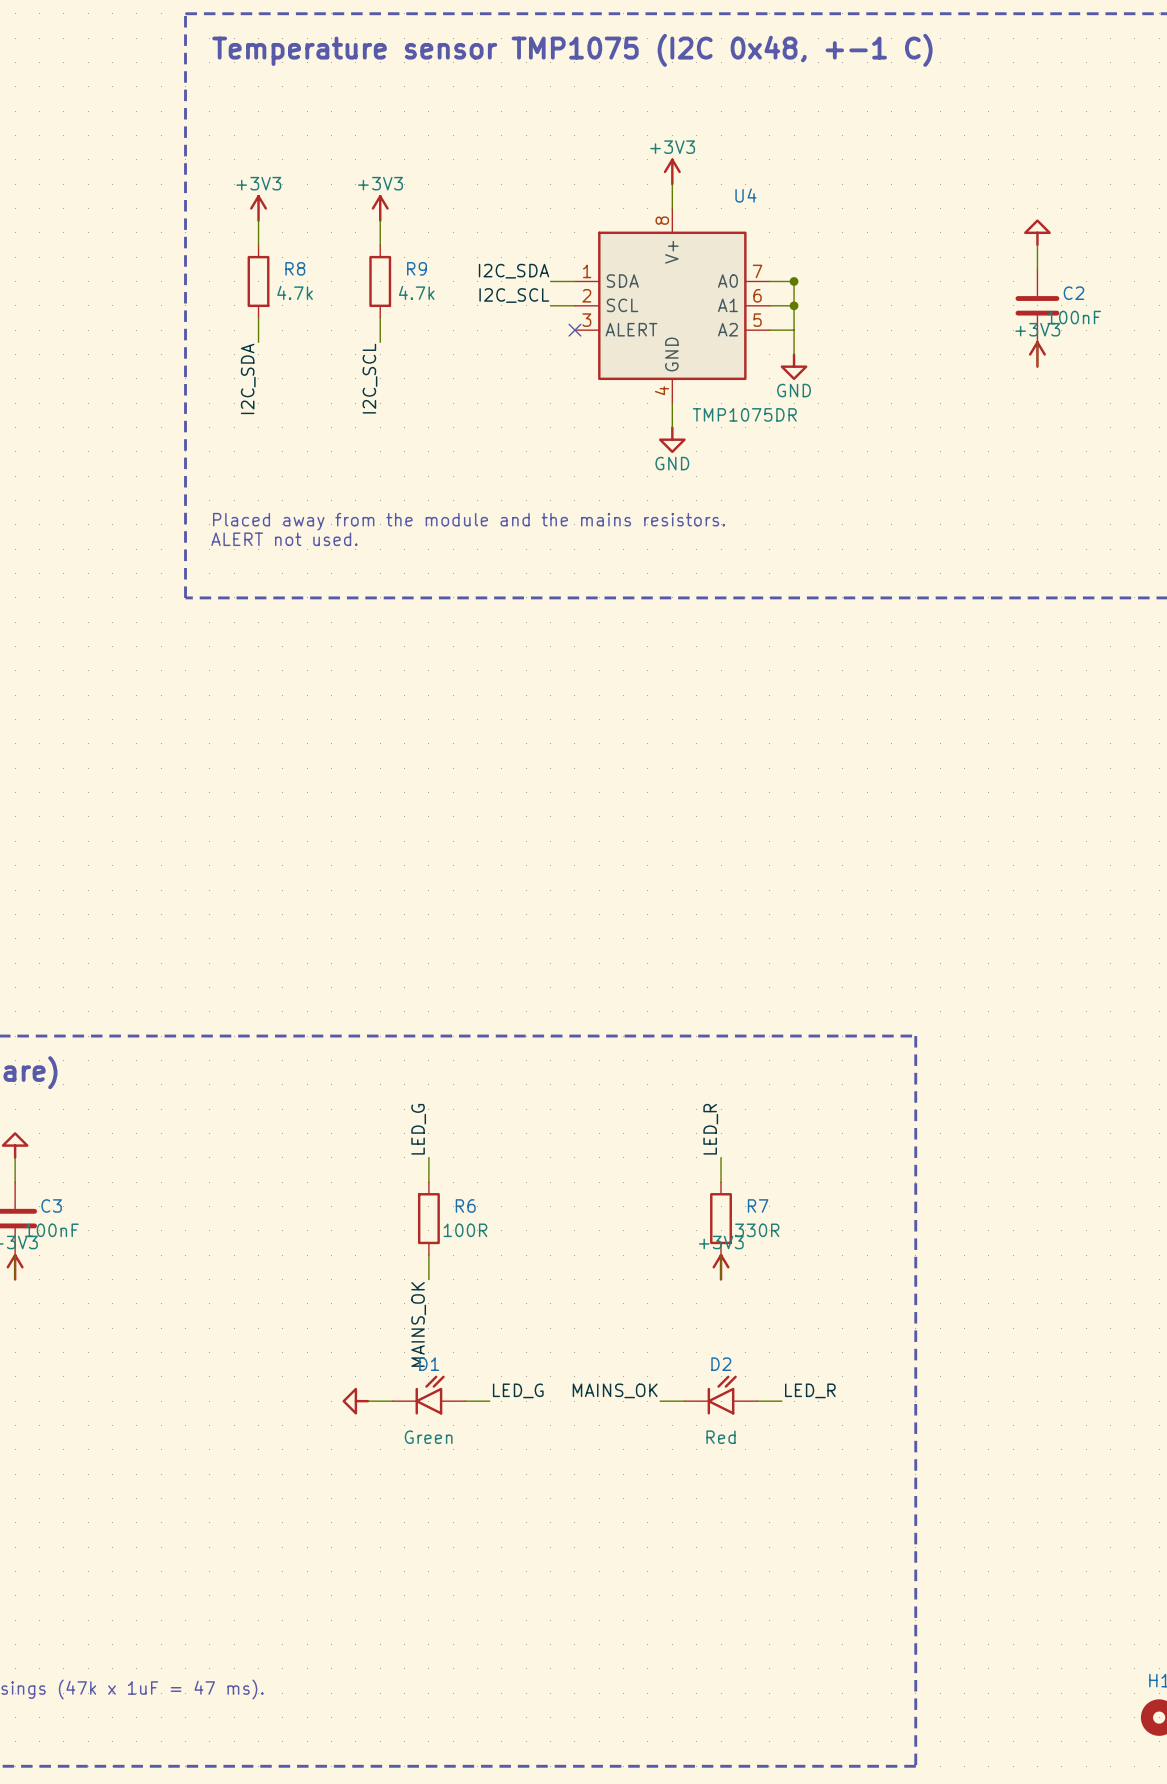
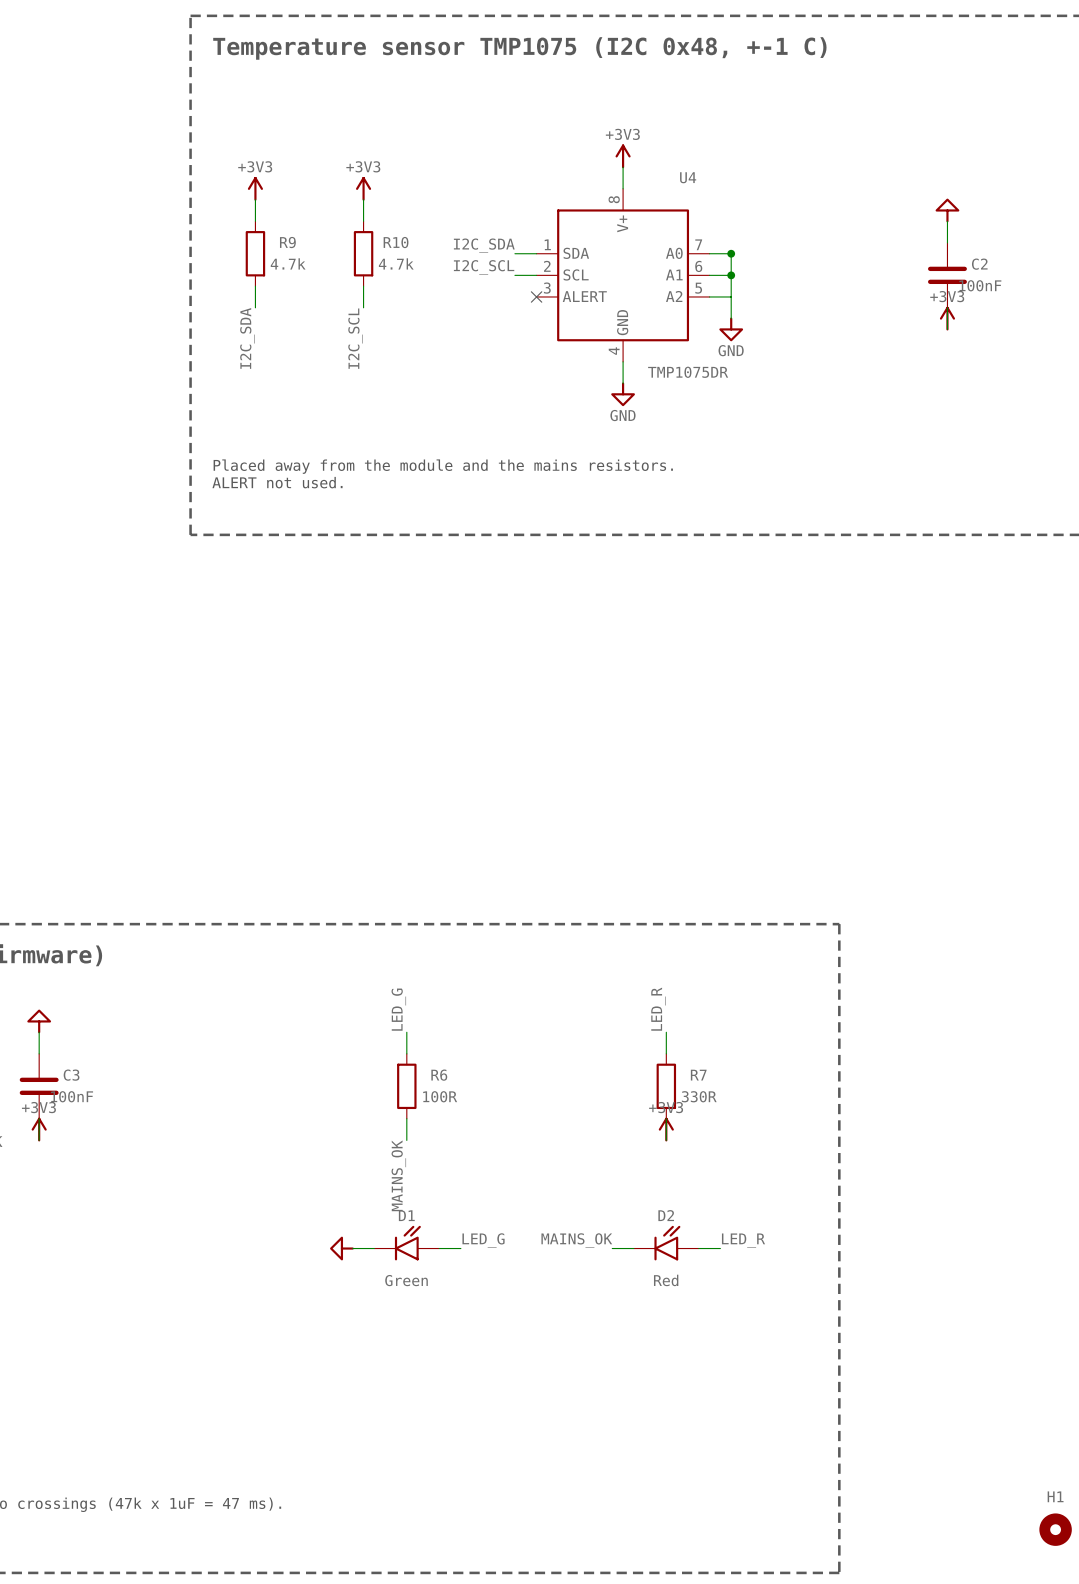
R8 name: R8 (295, 268) -> R9 (287, 242)
R9 name: R9 (417, 268) -> R10 (396, 242)

